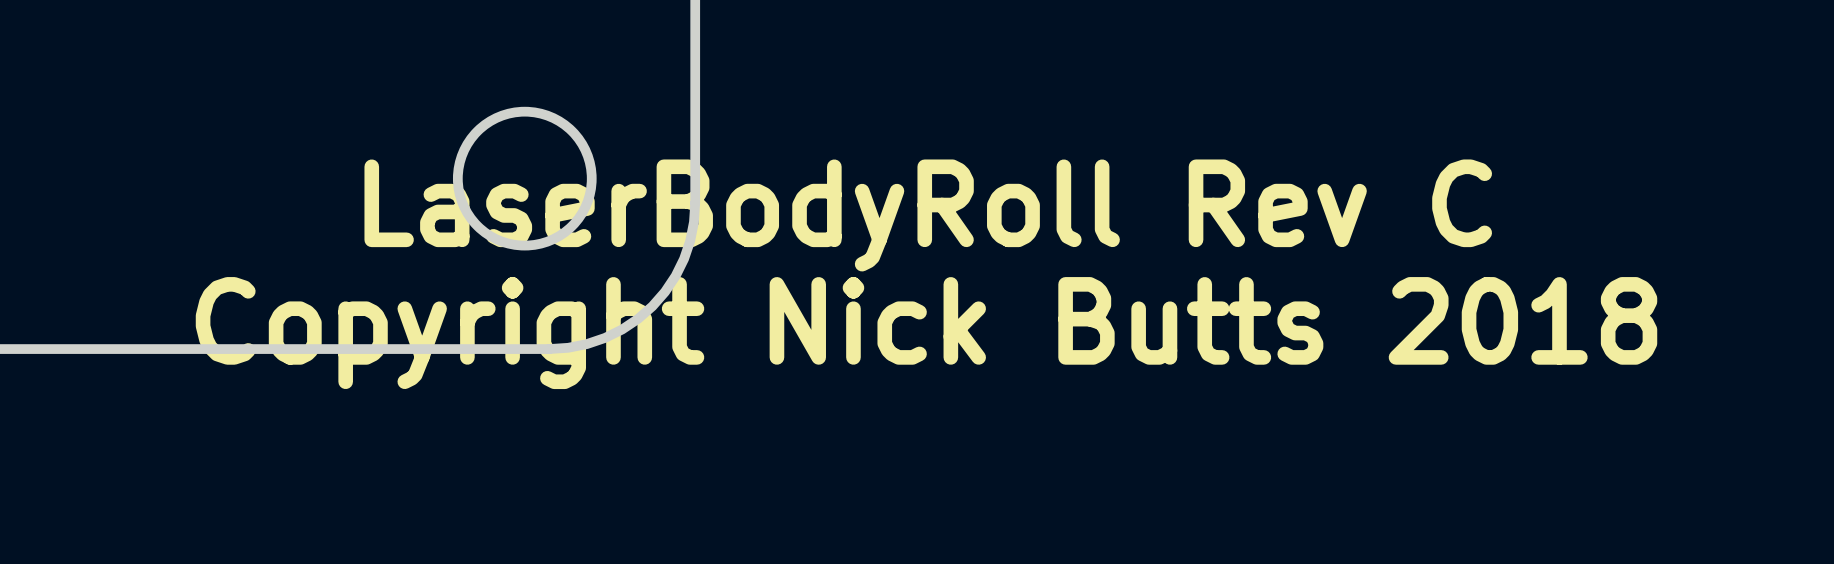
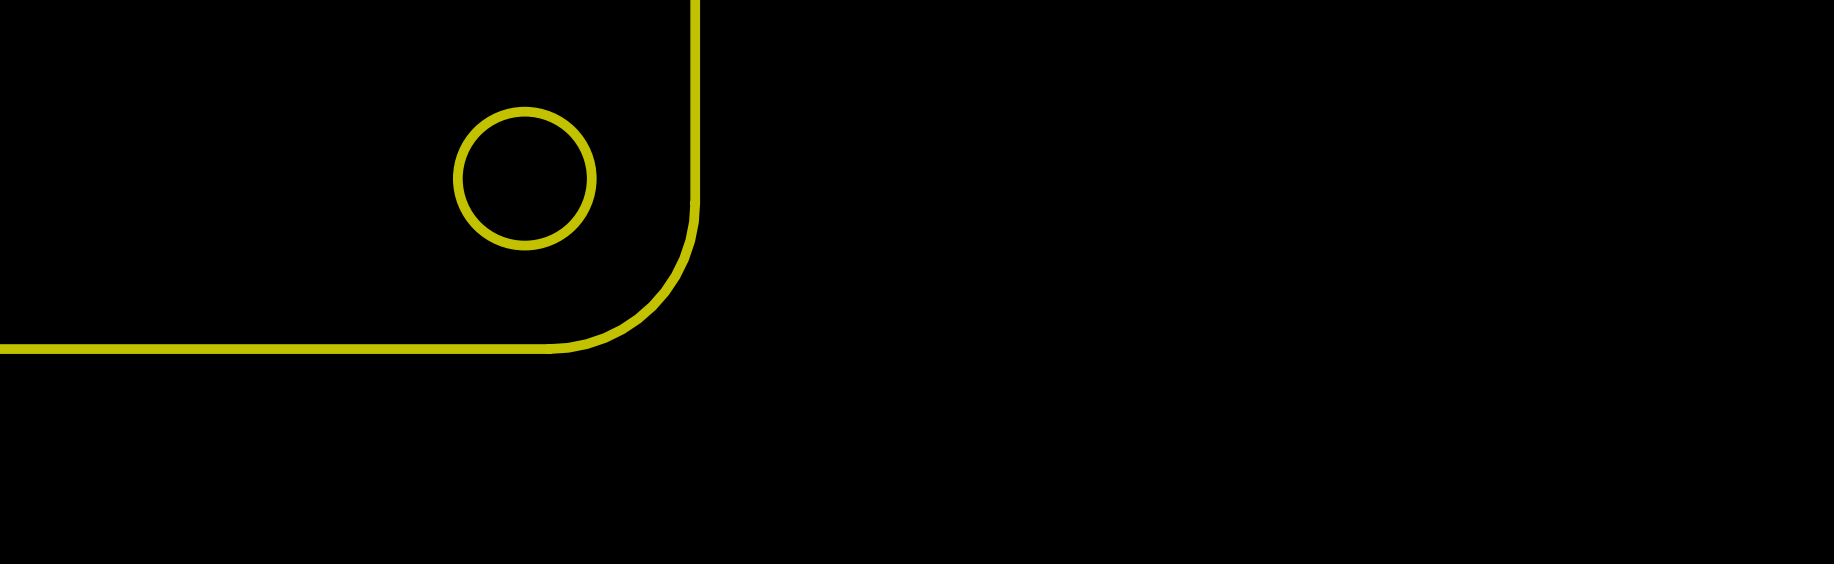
text: LaserBodyRoll Rev C (928, 215) -> none
text: Copyright Nick Butts 2018 (926, 333) -> none

